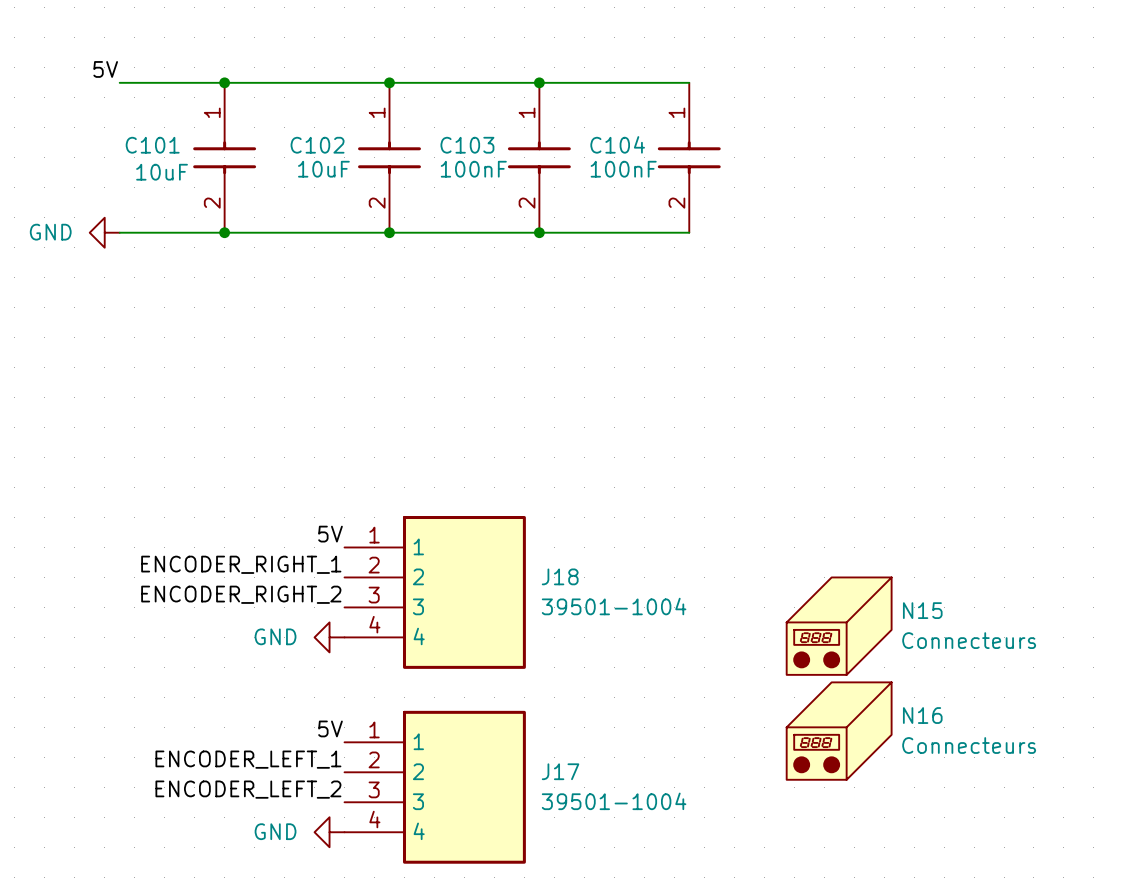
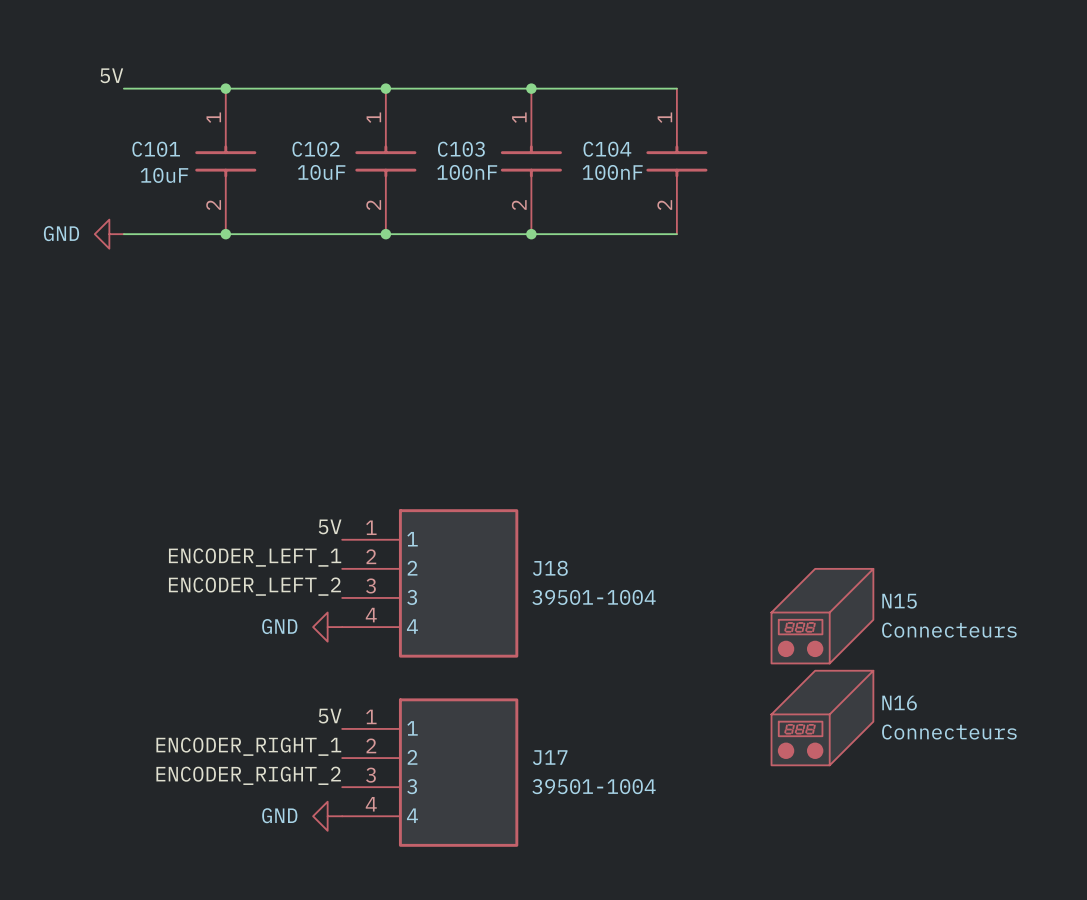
label: ENCODER_RIGHT_1 (241, 564) -> ENCODER_LEFT_1 (255, 557)
label: ENCODER_RIGHT_2 (241, 594) -> ENCODER_LEFT_2 (254, 586)
label: ENCODER_LEFT_1 (248, 759) -> ENCODER_RIGHT_1 (248, 746)
label: ENCODER_LEFT_2 (248, 789) -> ENCODER_RIGHT_2 (248, 775)

